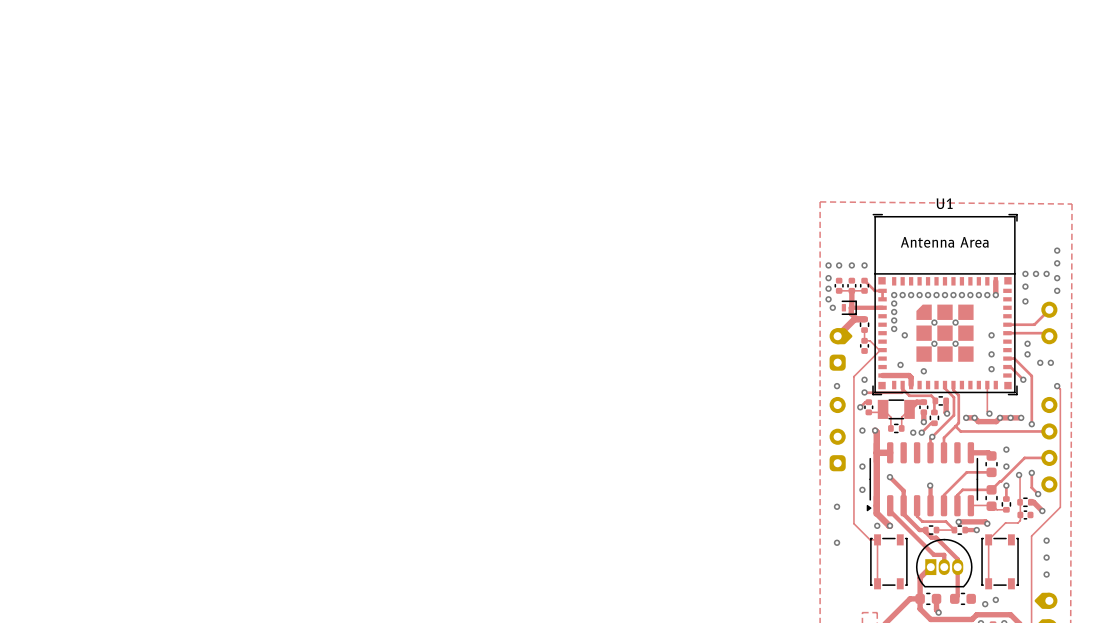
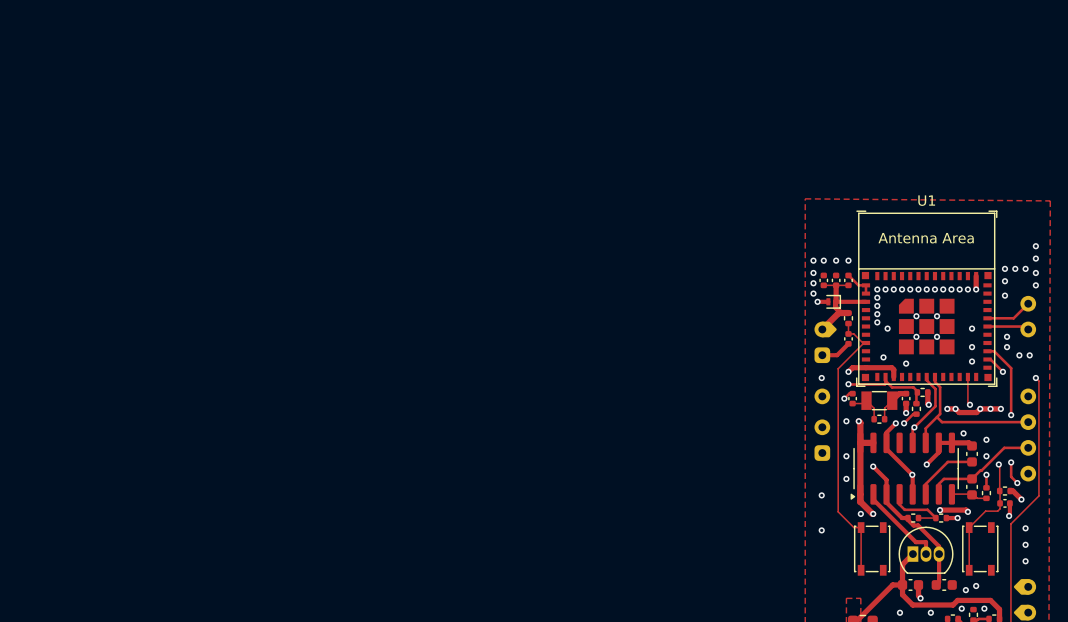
track: none -> (817, 301) (828, 301)
track: none -> (848, 343) (837, 355) (822, 355)
track: none -> (865, 367) (852, 367) (848, 371)
track: none -> (895, 423) (886, 432) (886, 449) (912, 474)
via: none -> (963, 433)
track: none -> (951, 442) (938, 442) (938, 452) (926, 464)
via: none -> (926, 464)
track: none -> (1009, 503) (1009, 515)
via: none -> (1009, 515)

